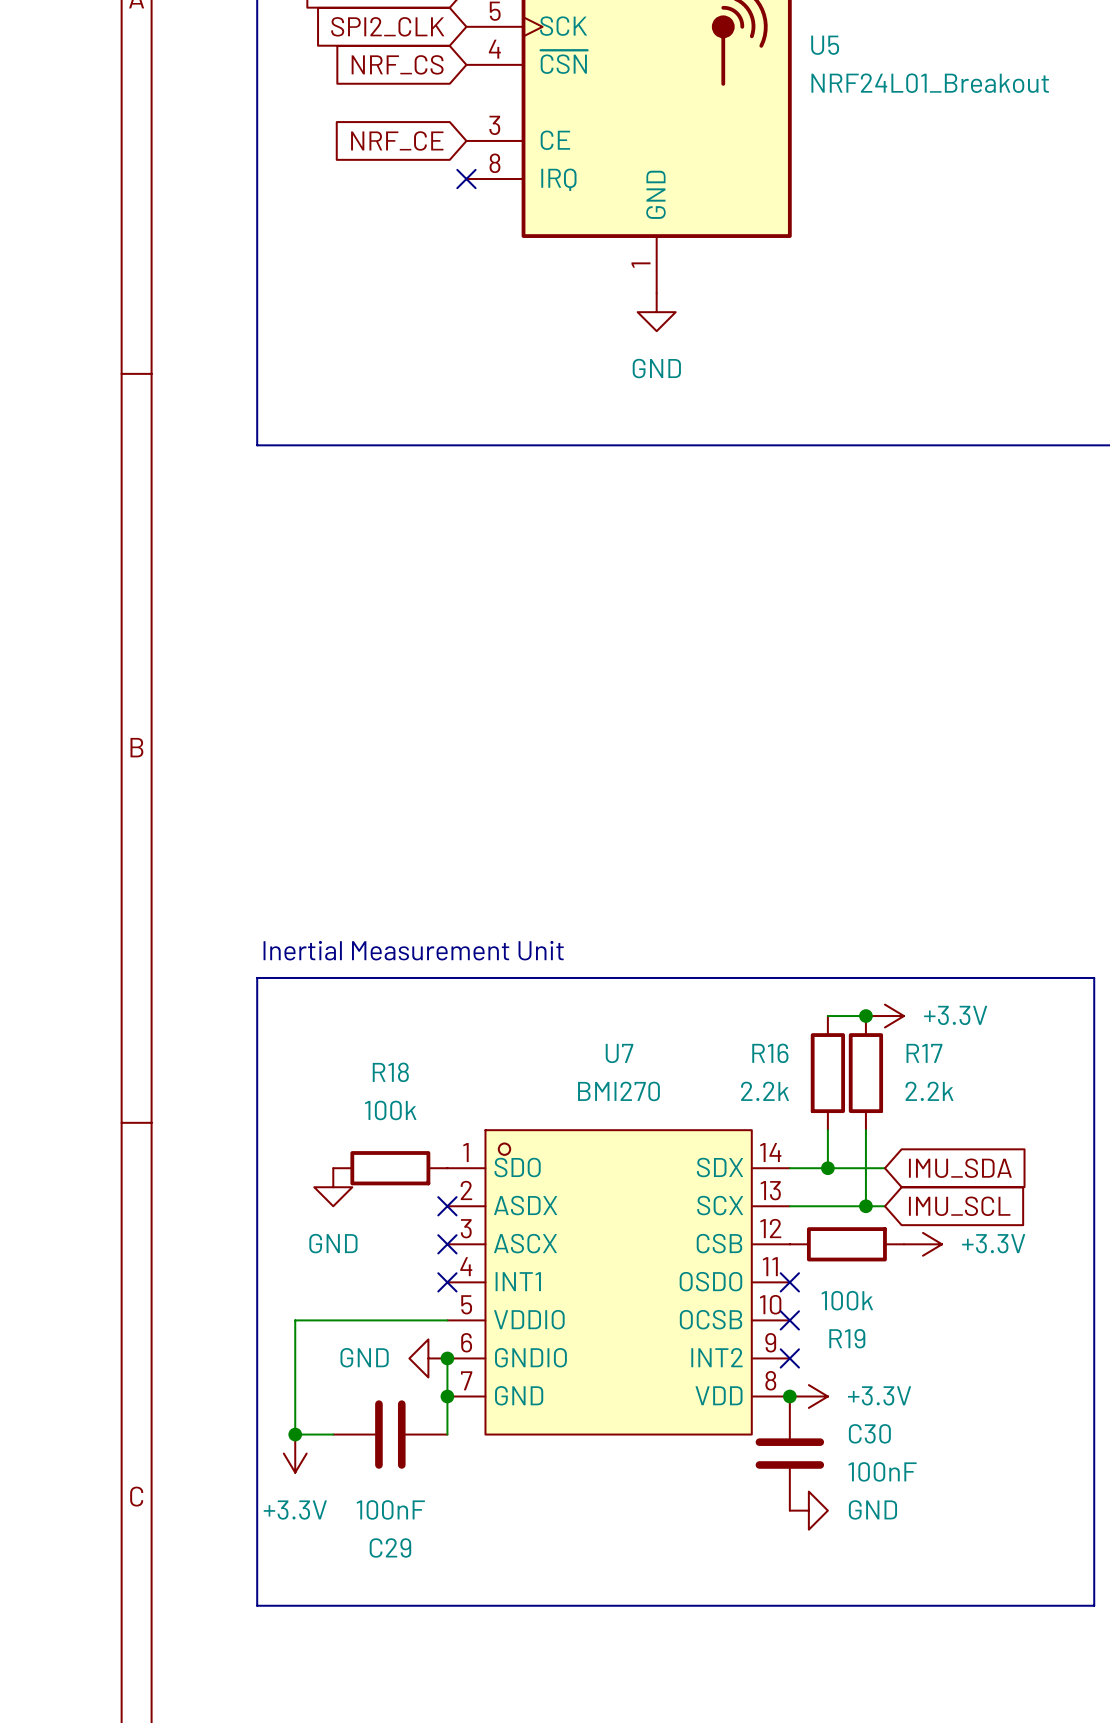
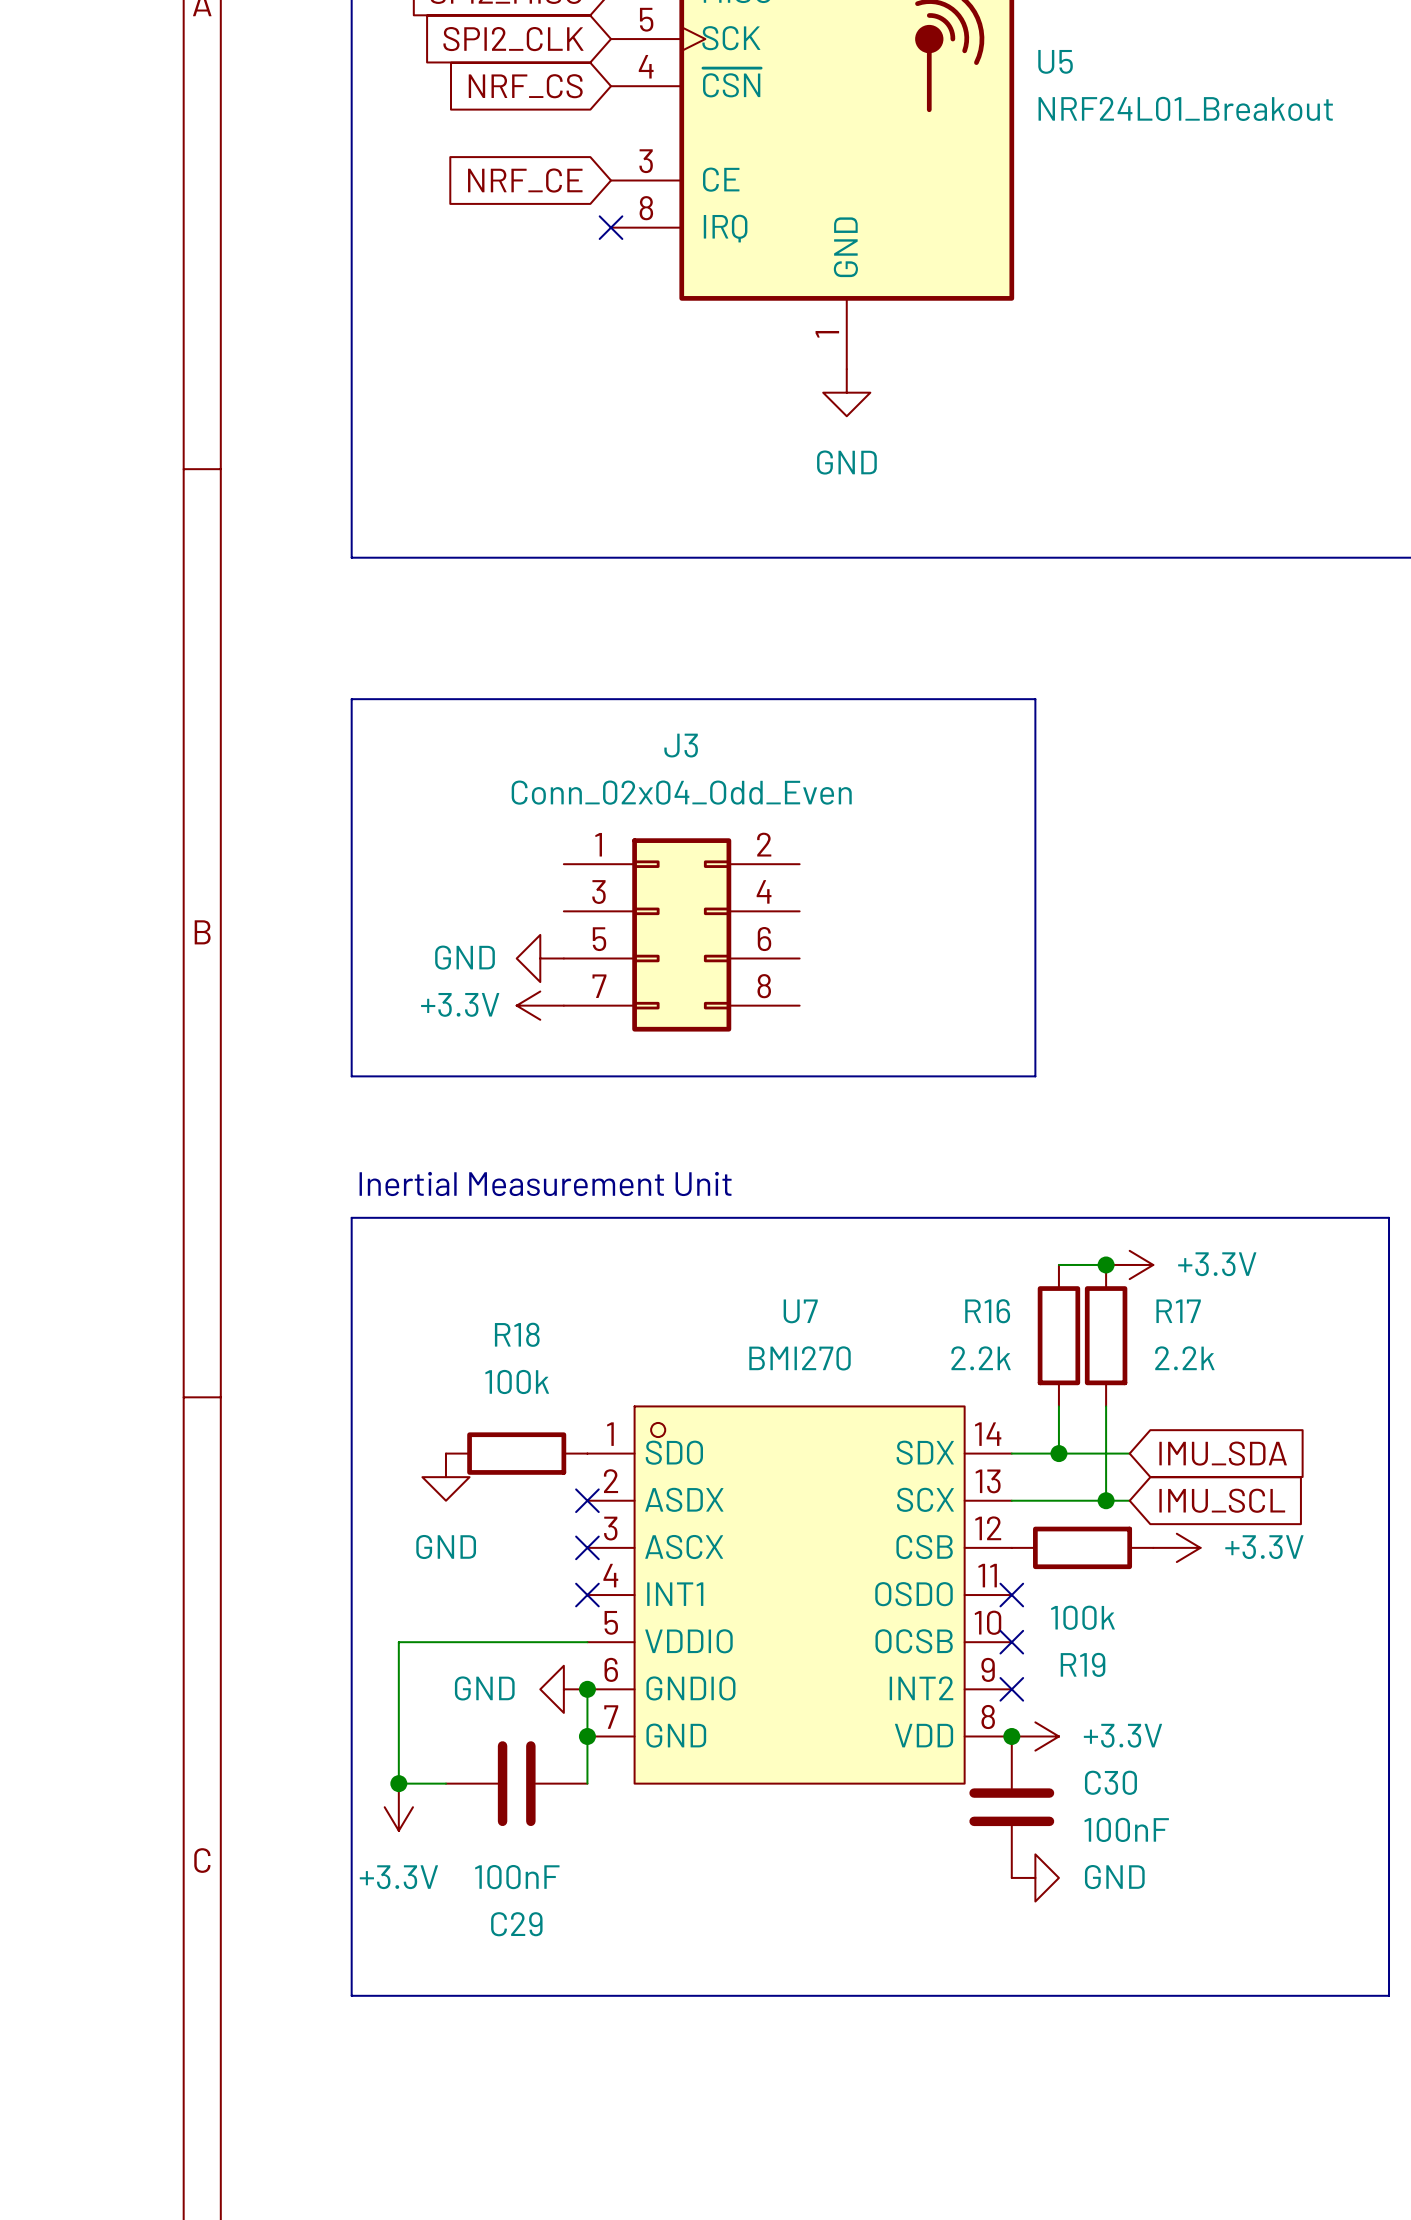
line: none -> (351, 699) (1035, 699) (1035, 1076) (351, 1076) (351, 699)
J3: none -> Conn_02x04_Odd_Even (681, 934)
power symbol: none -> GND (540, 958)
power symbol: none -> +3.3V (540, 1005)

